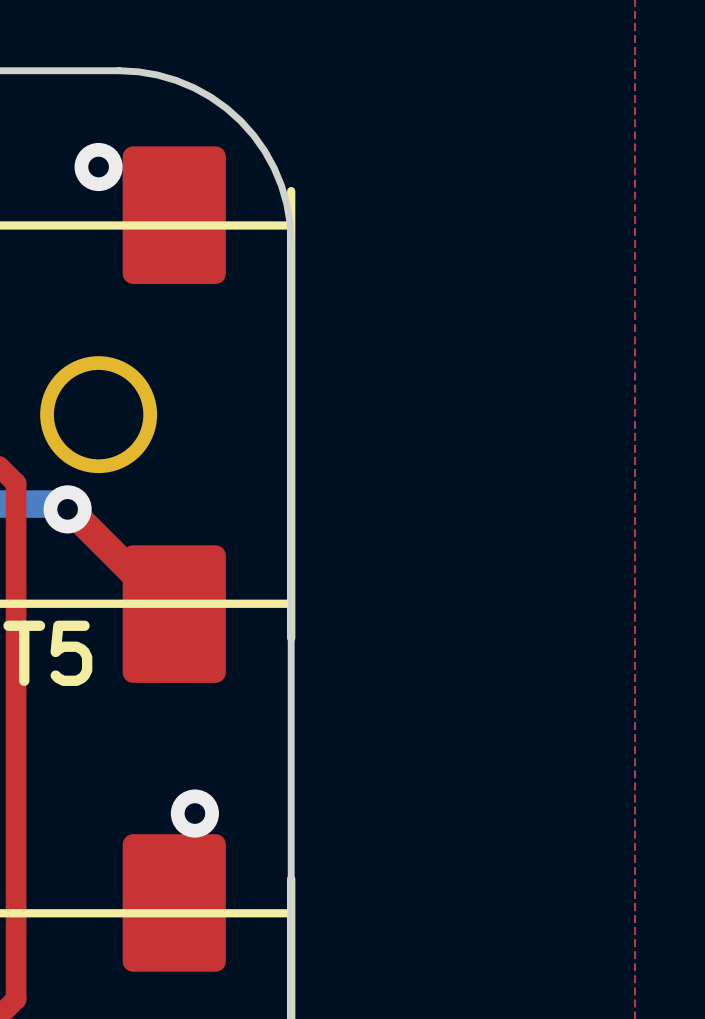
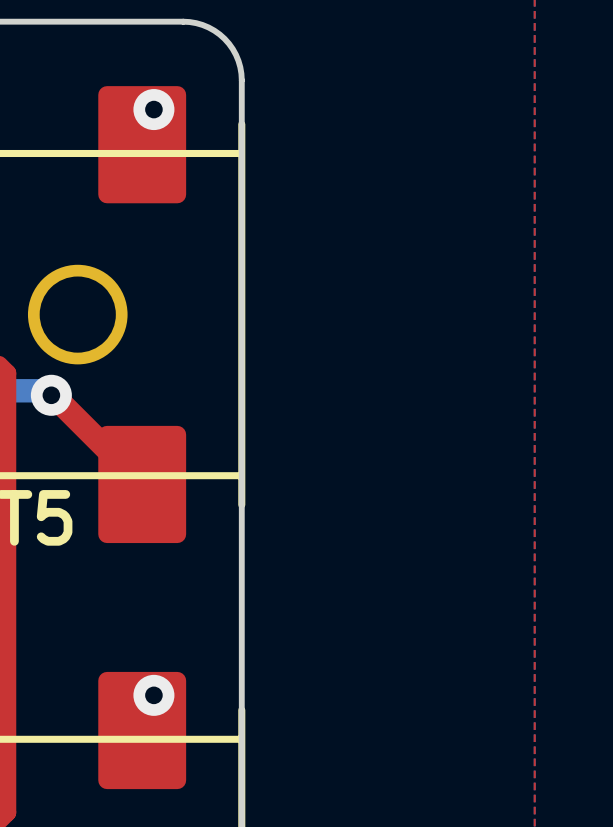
board edge: (119, 70) (157, 75) (193, 87) (210, 97) (240, 121) (264, 151) (281, 185) (290, 223) (291, 242) -> (95, 21) (189, 22) (208, 27) (224, 38) (235, 54) (241, 73) (241, 168)
via position: (98, 167) -> (153, 109)
via position: (194, 813) -> (153, 695)

